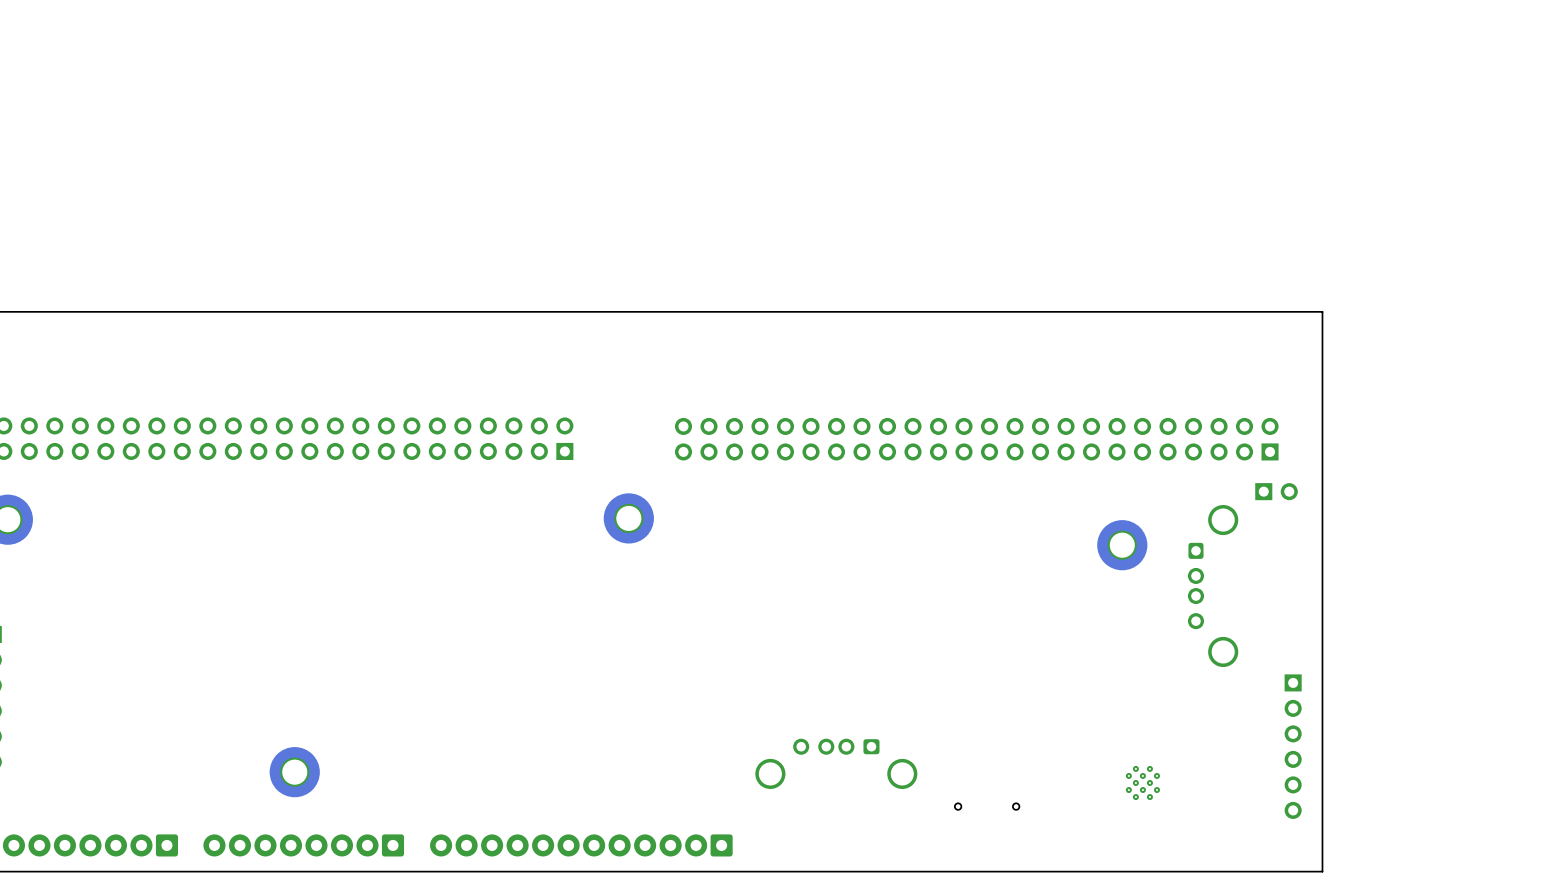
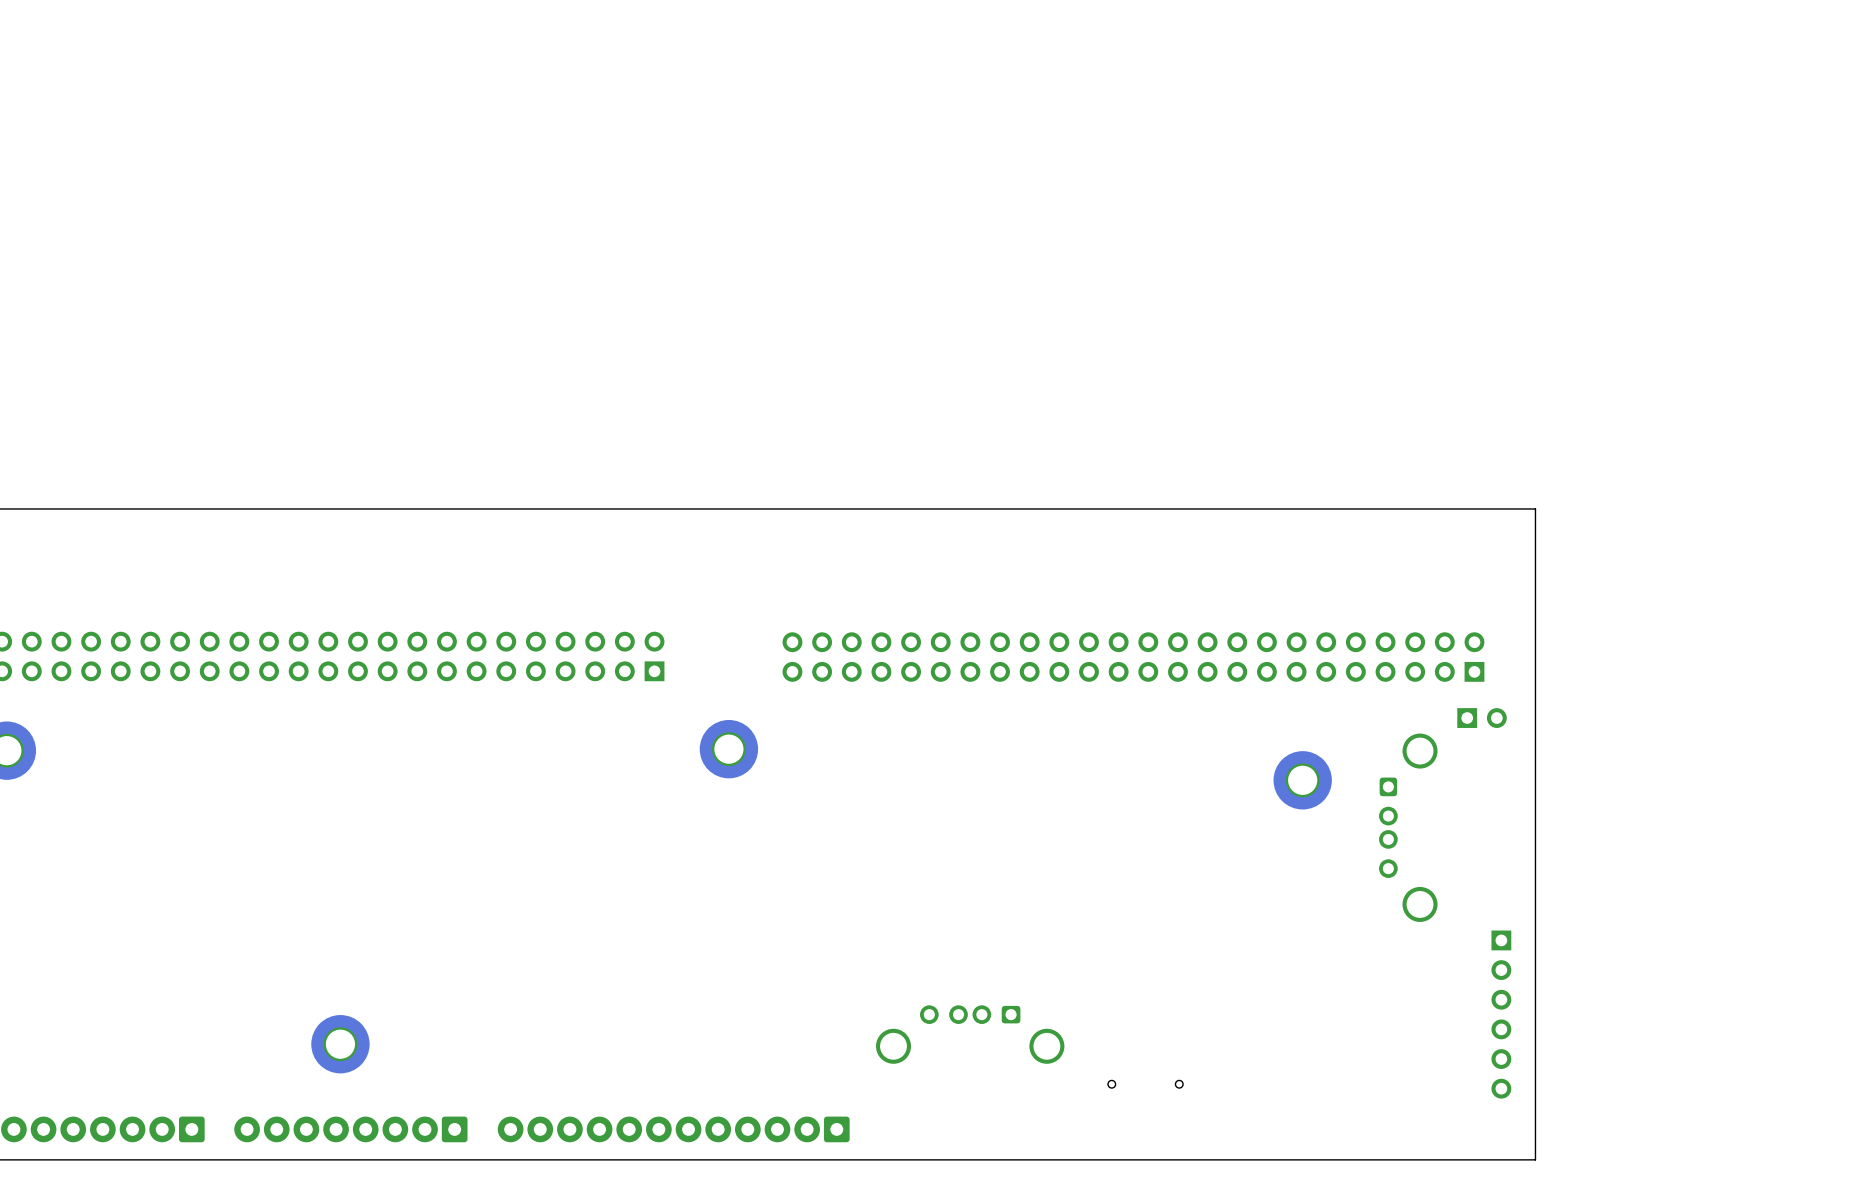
part: (1142, 782) -> none

